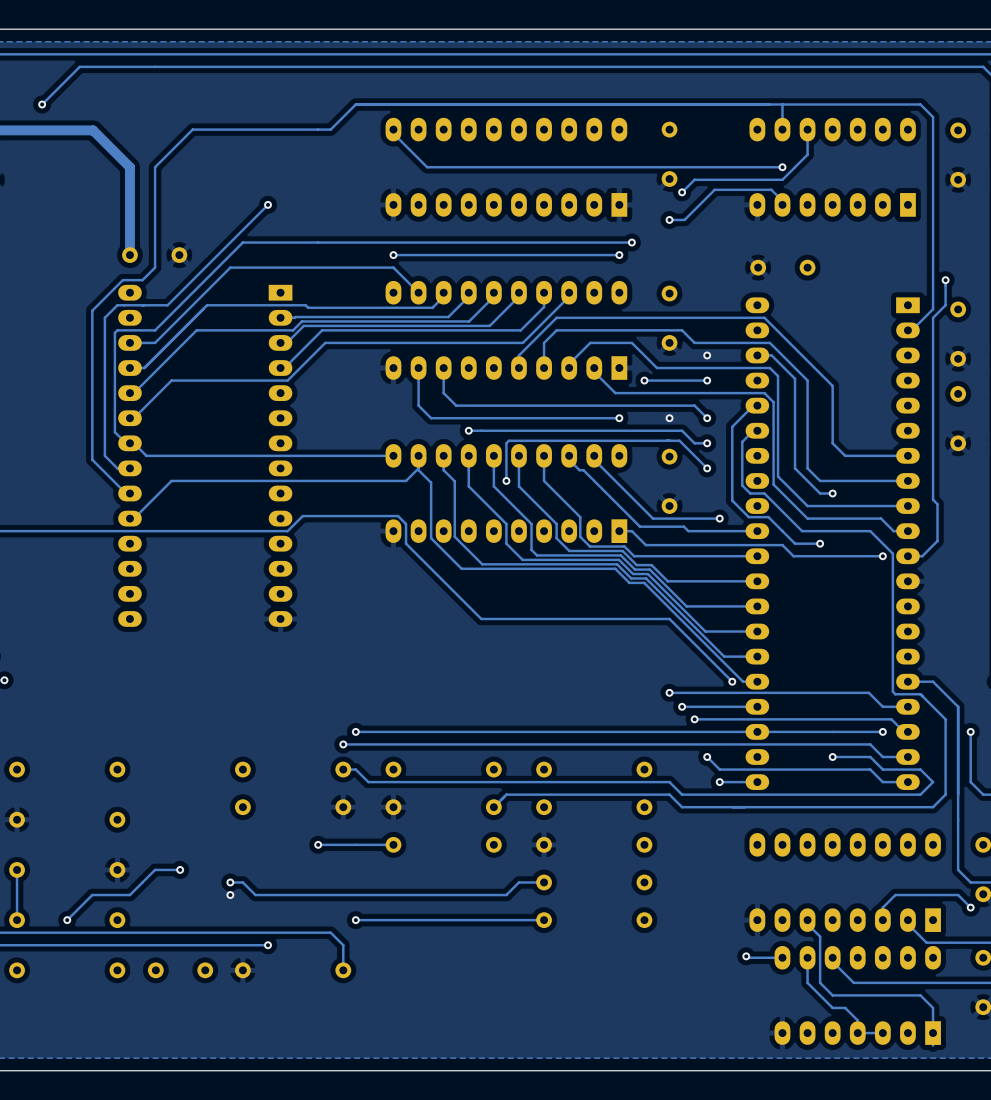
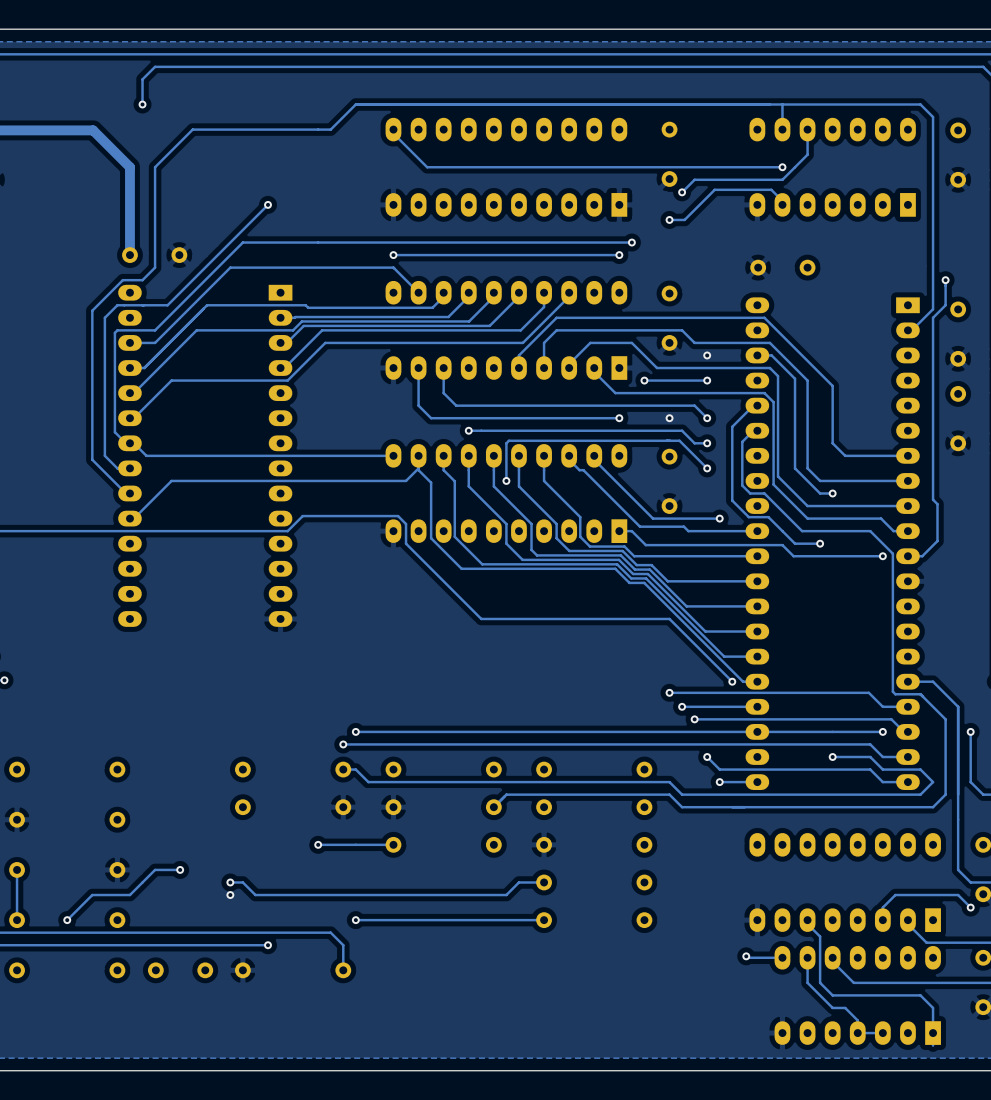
track: (155, 66) (79, 66) (42, 104) -> (155, 66) (142, 79) (142, 104)
via: (42, 104) -> none
via: none -> (142, 104)

